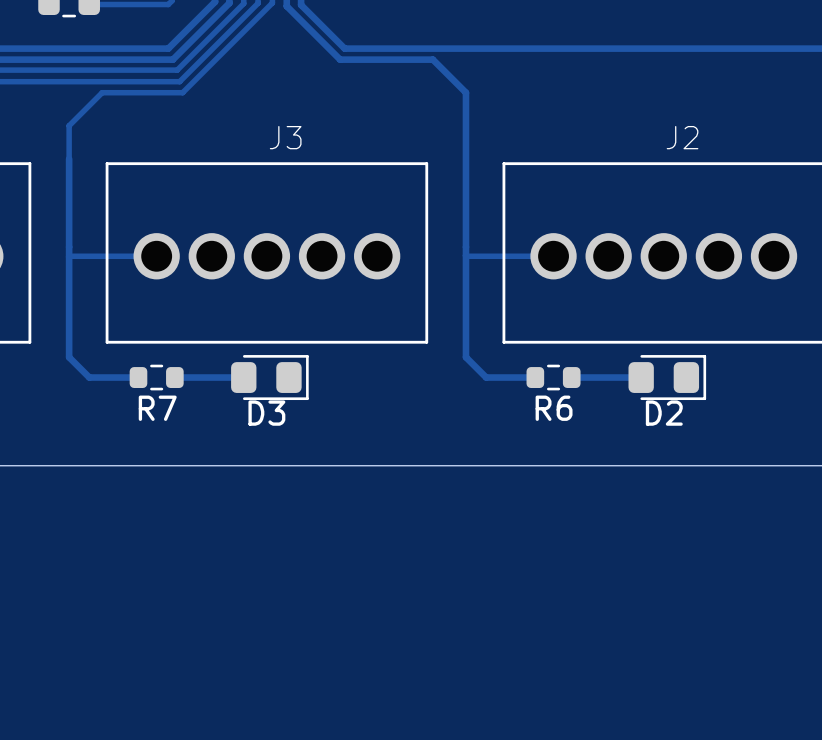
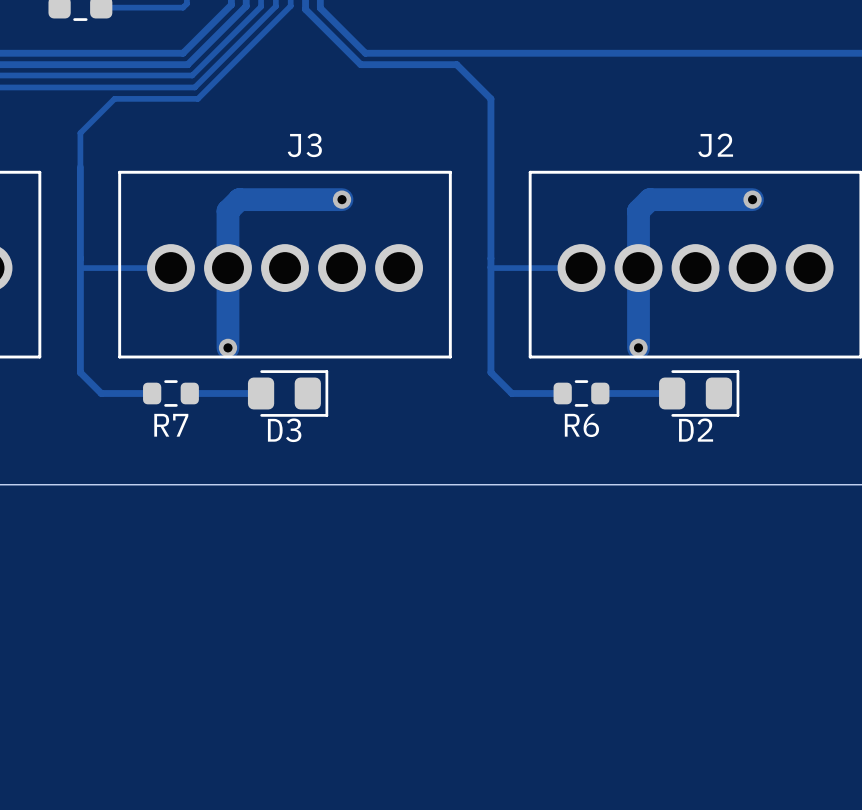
track: none -> (342, 199) (239, 199) (227, 211) (227, 347)
via: none -> (342, 199)
track: none -> (752, 199) (649, 199) (638, 211) (638, 347)
via: none -> (752, 199)
via: none -> (227, 347)
via: none -> (638, 347)

